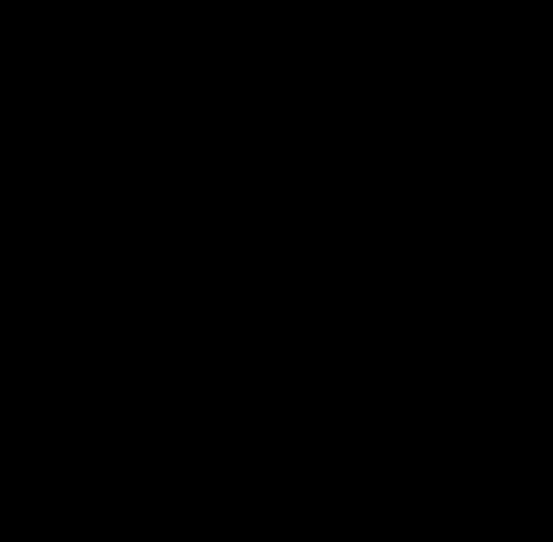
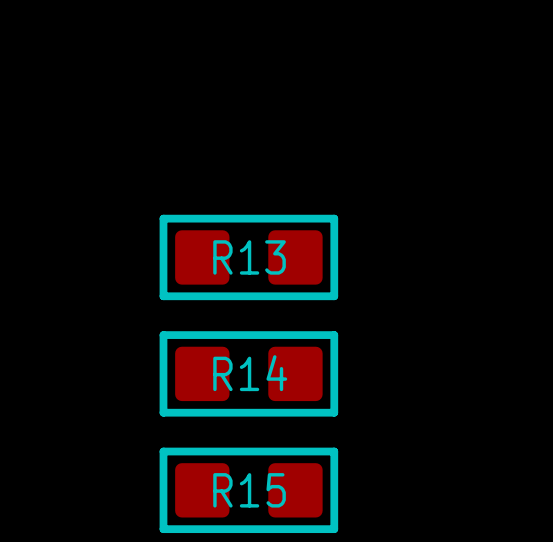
R13: none -> (248, 257)
R14: none -> (248, 373)
R15: none -> (248, 490)

